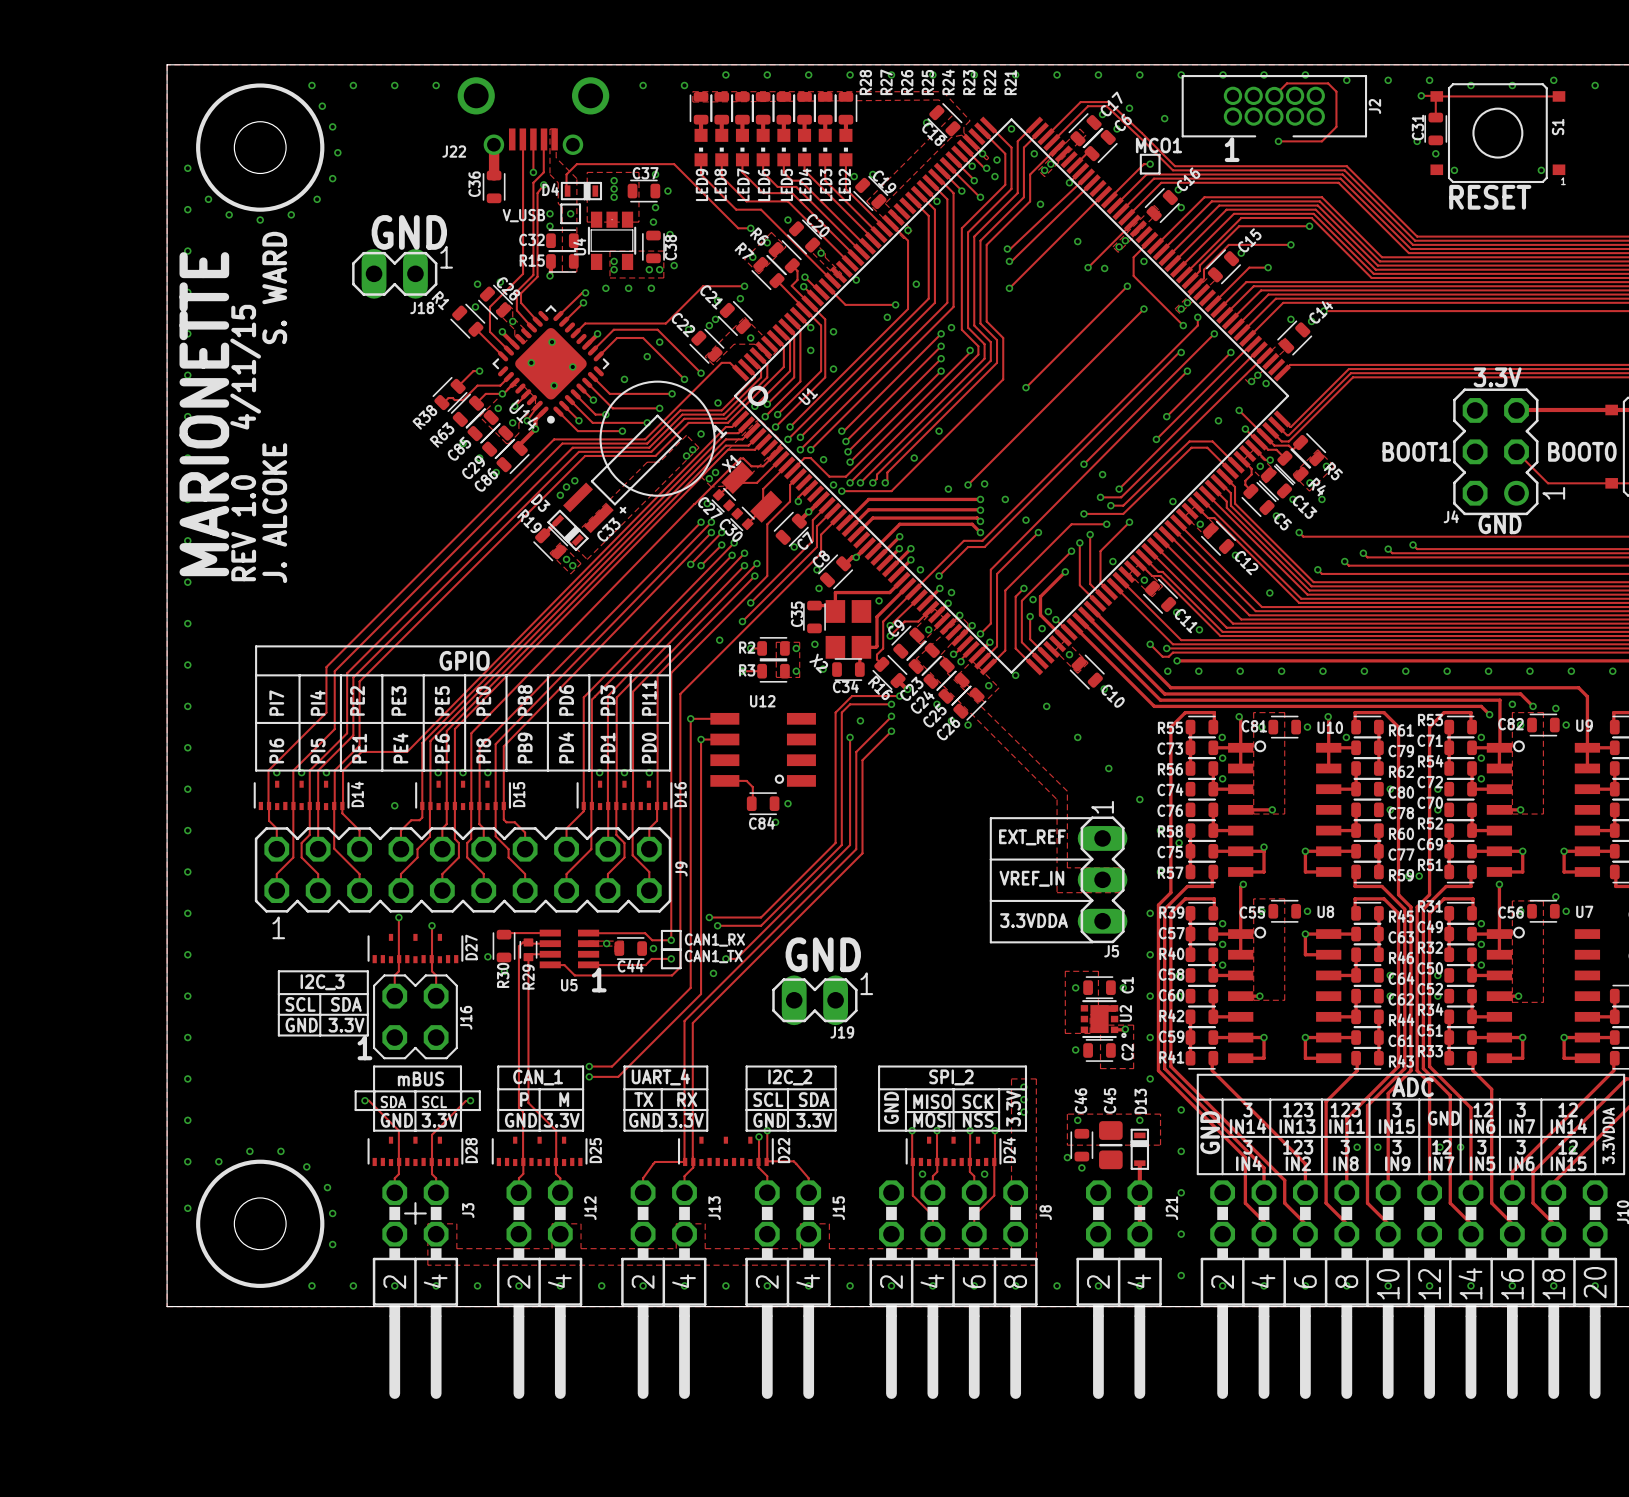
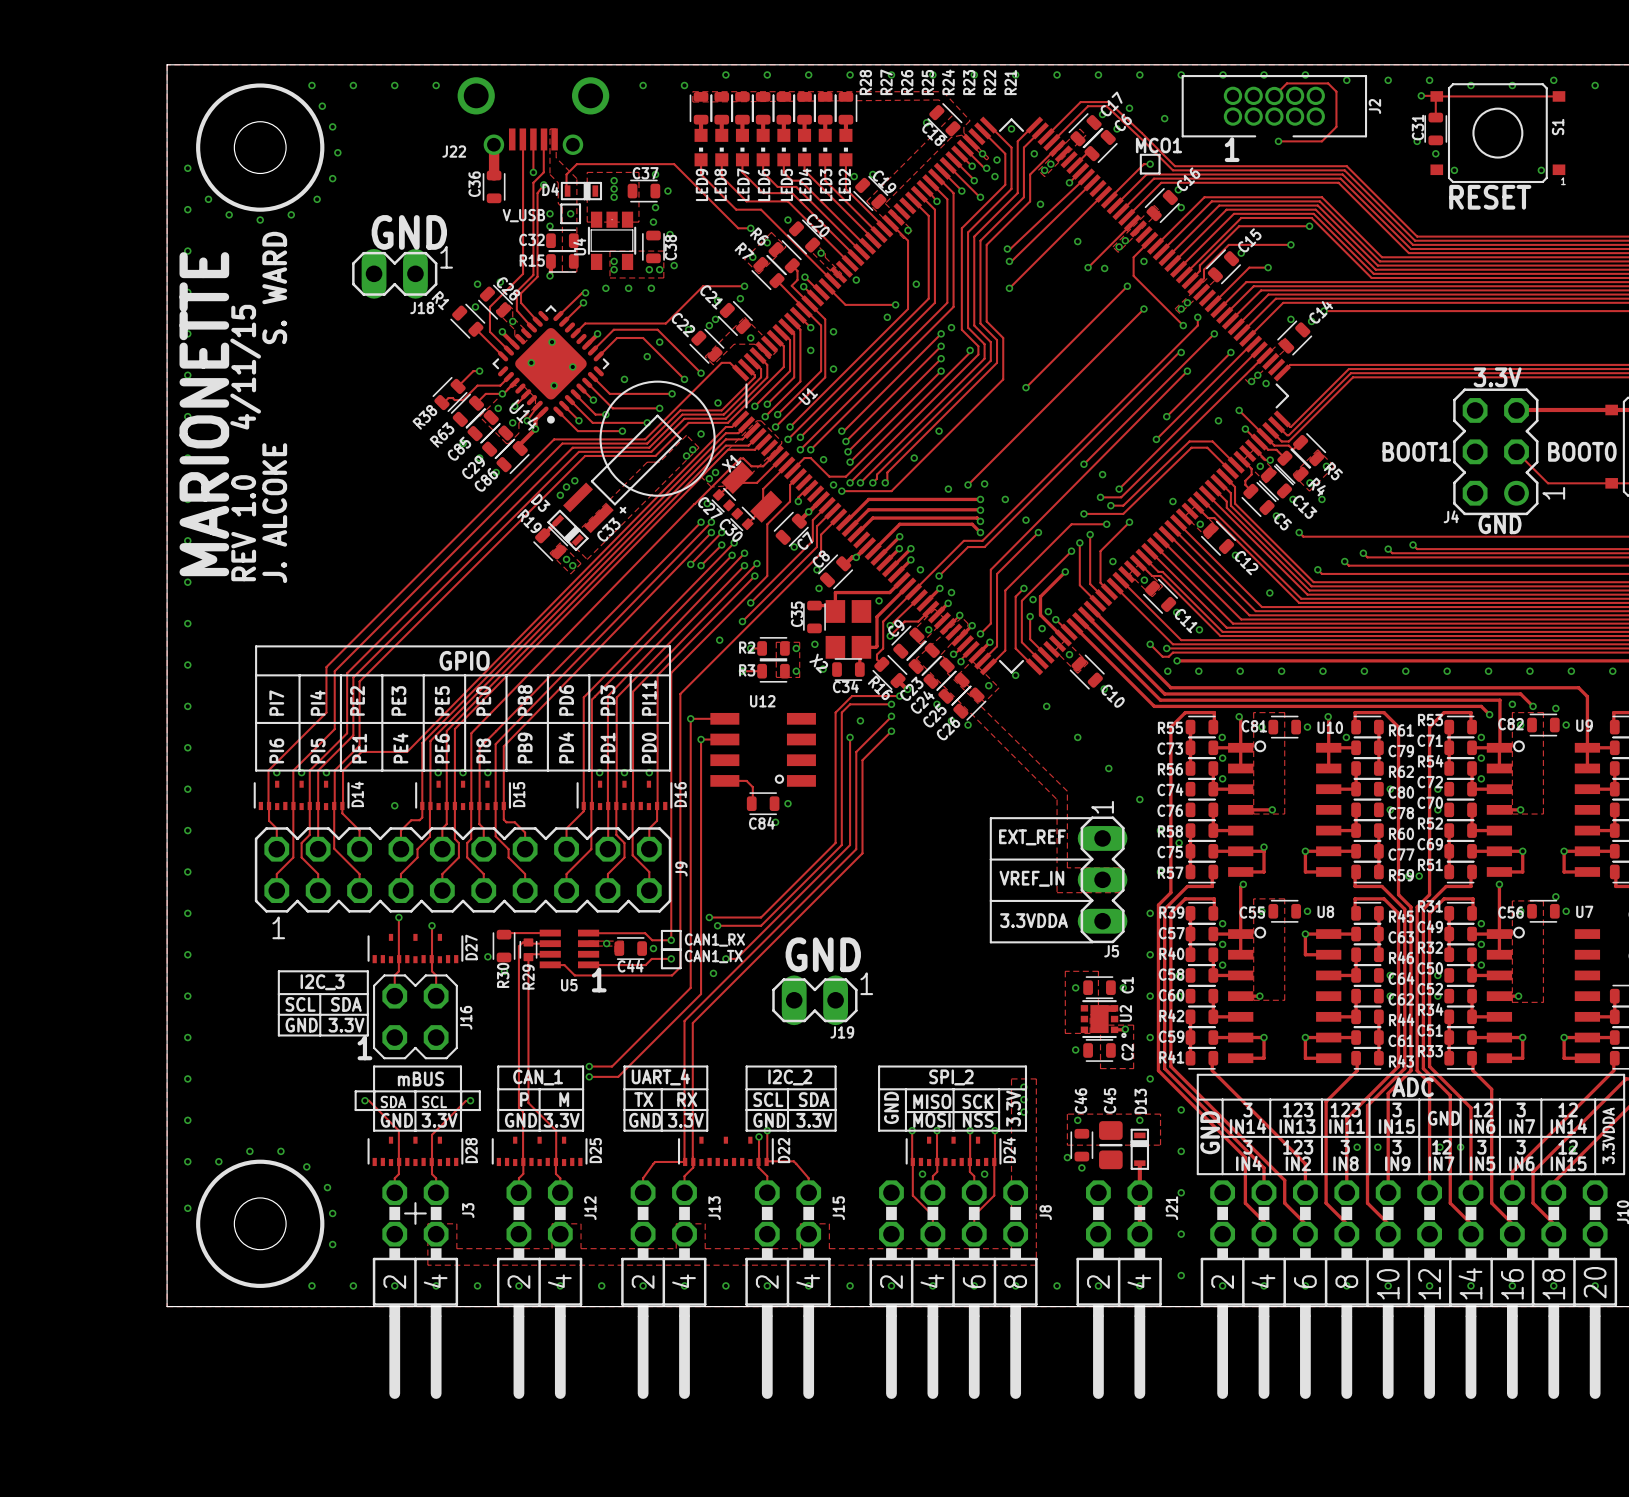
U1 footprint: [732, 116, 1291, 676] -> [732, 116, 1291, 676]

